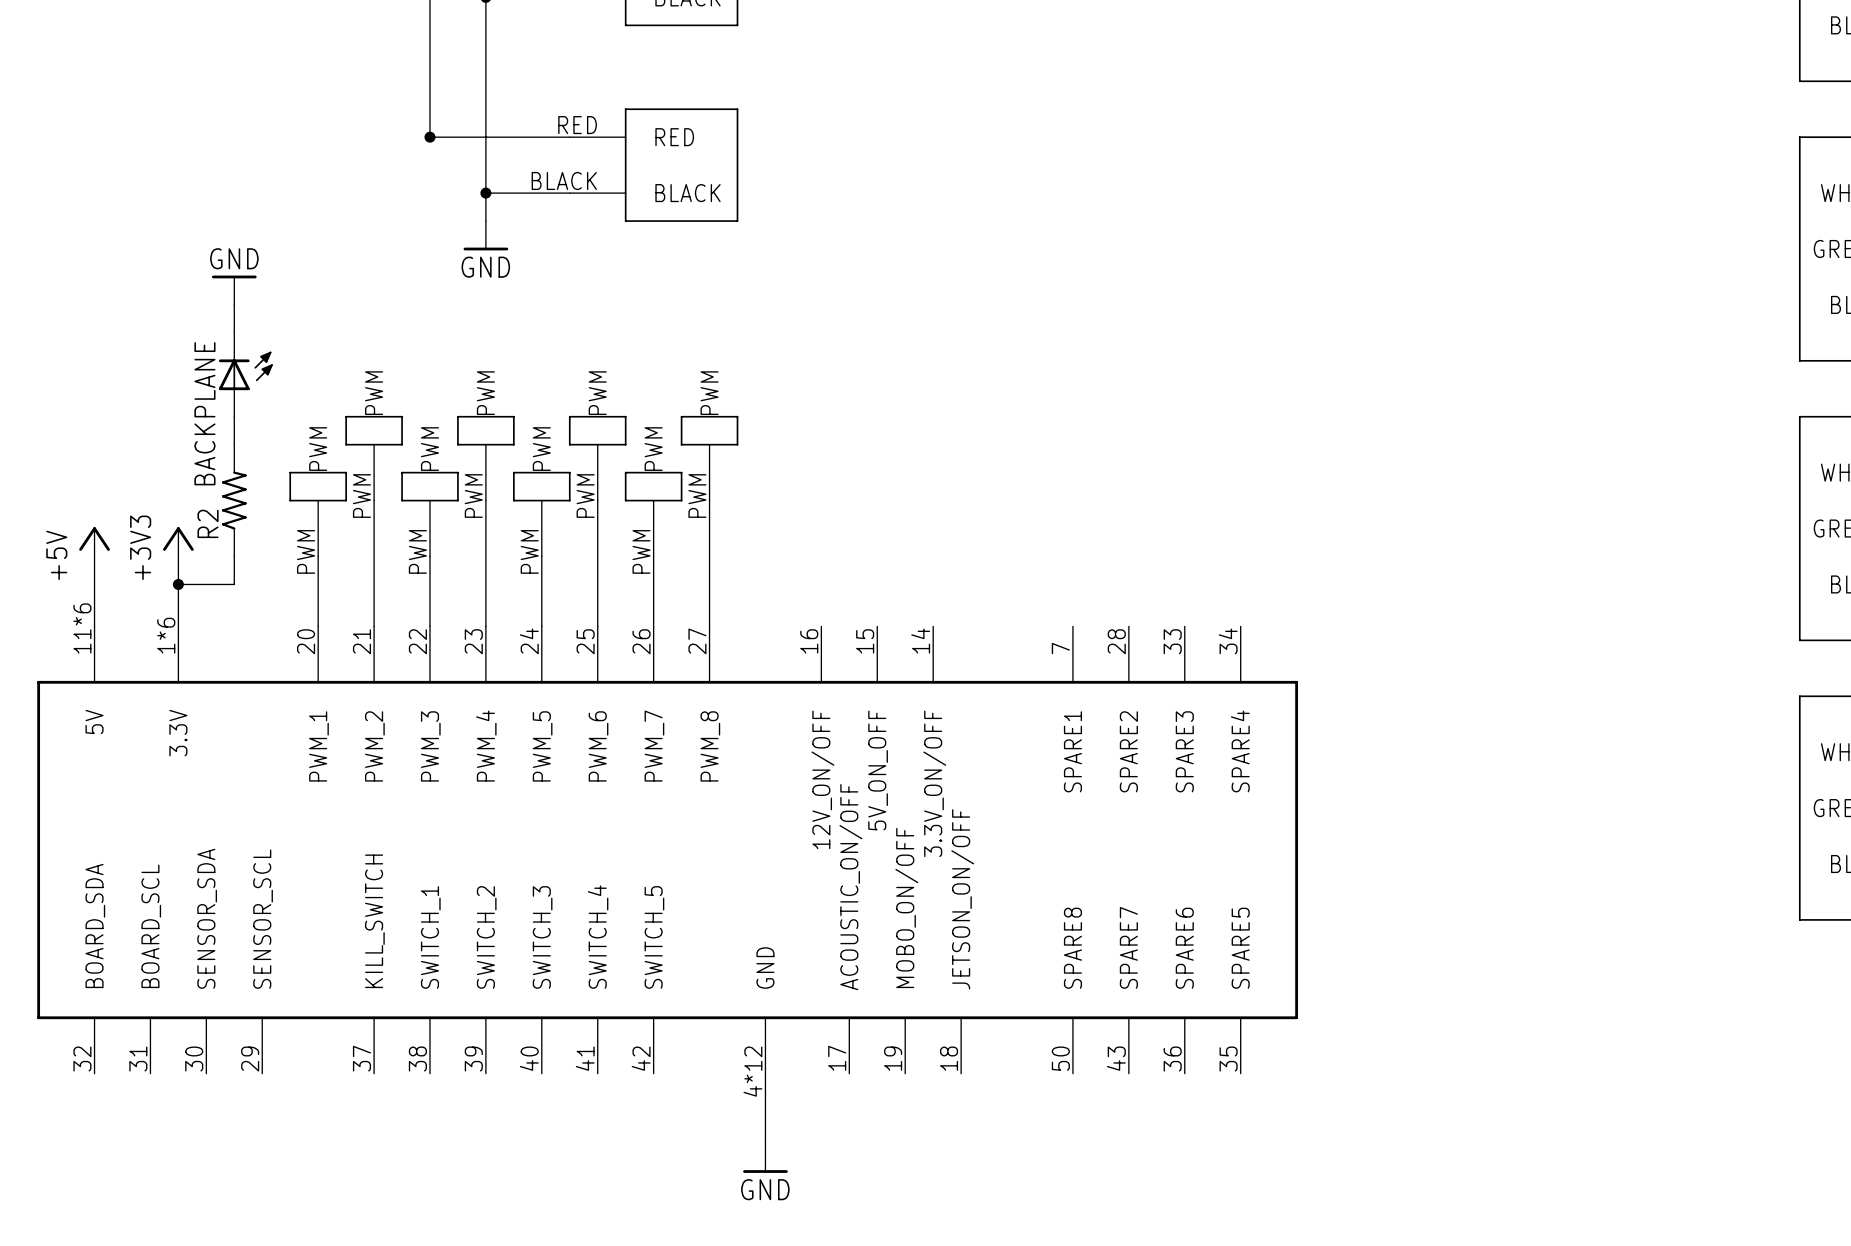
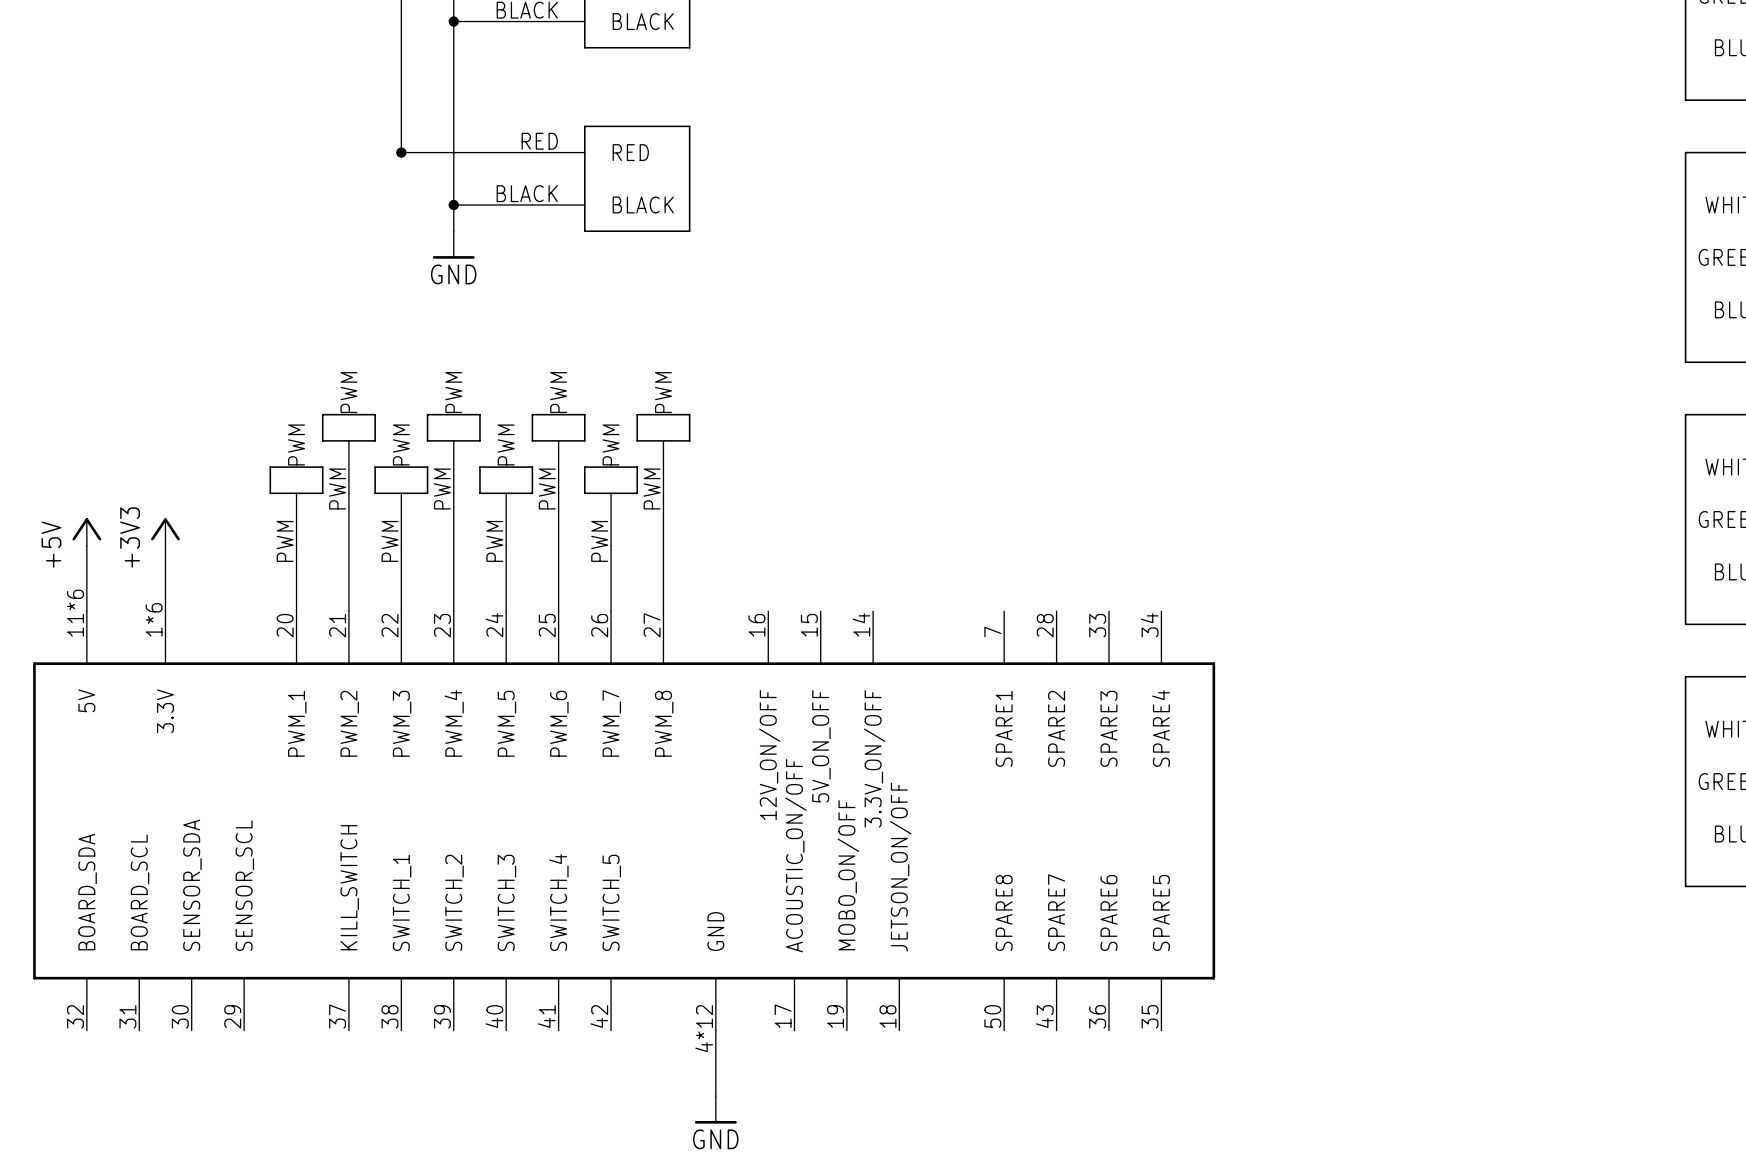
power symbol: GND (234, 290) -> none
wire: (234, 304) (234, 332) -> none
BACKPLANE: (245, 374) -> none
wire: (234, 416) (234, 444) -> none
R2: (234, 500) -> none
wire: (234, 556) (234, 584) (178, 584) -> none
junction: (178, 584) -> none

